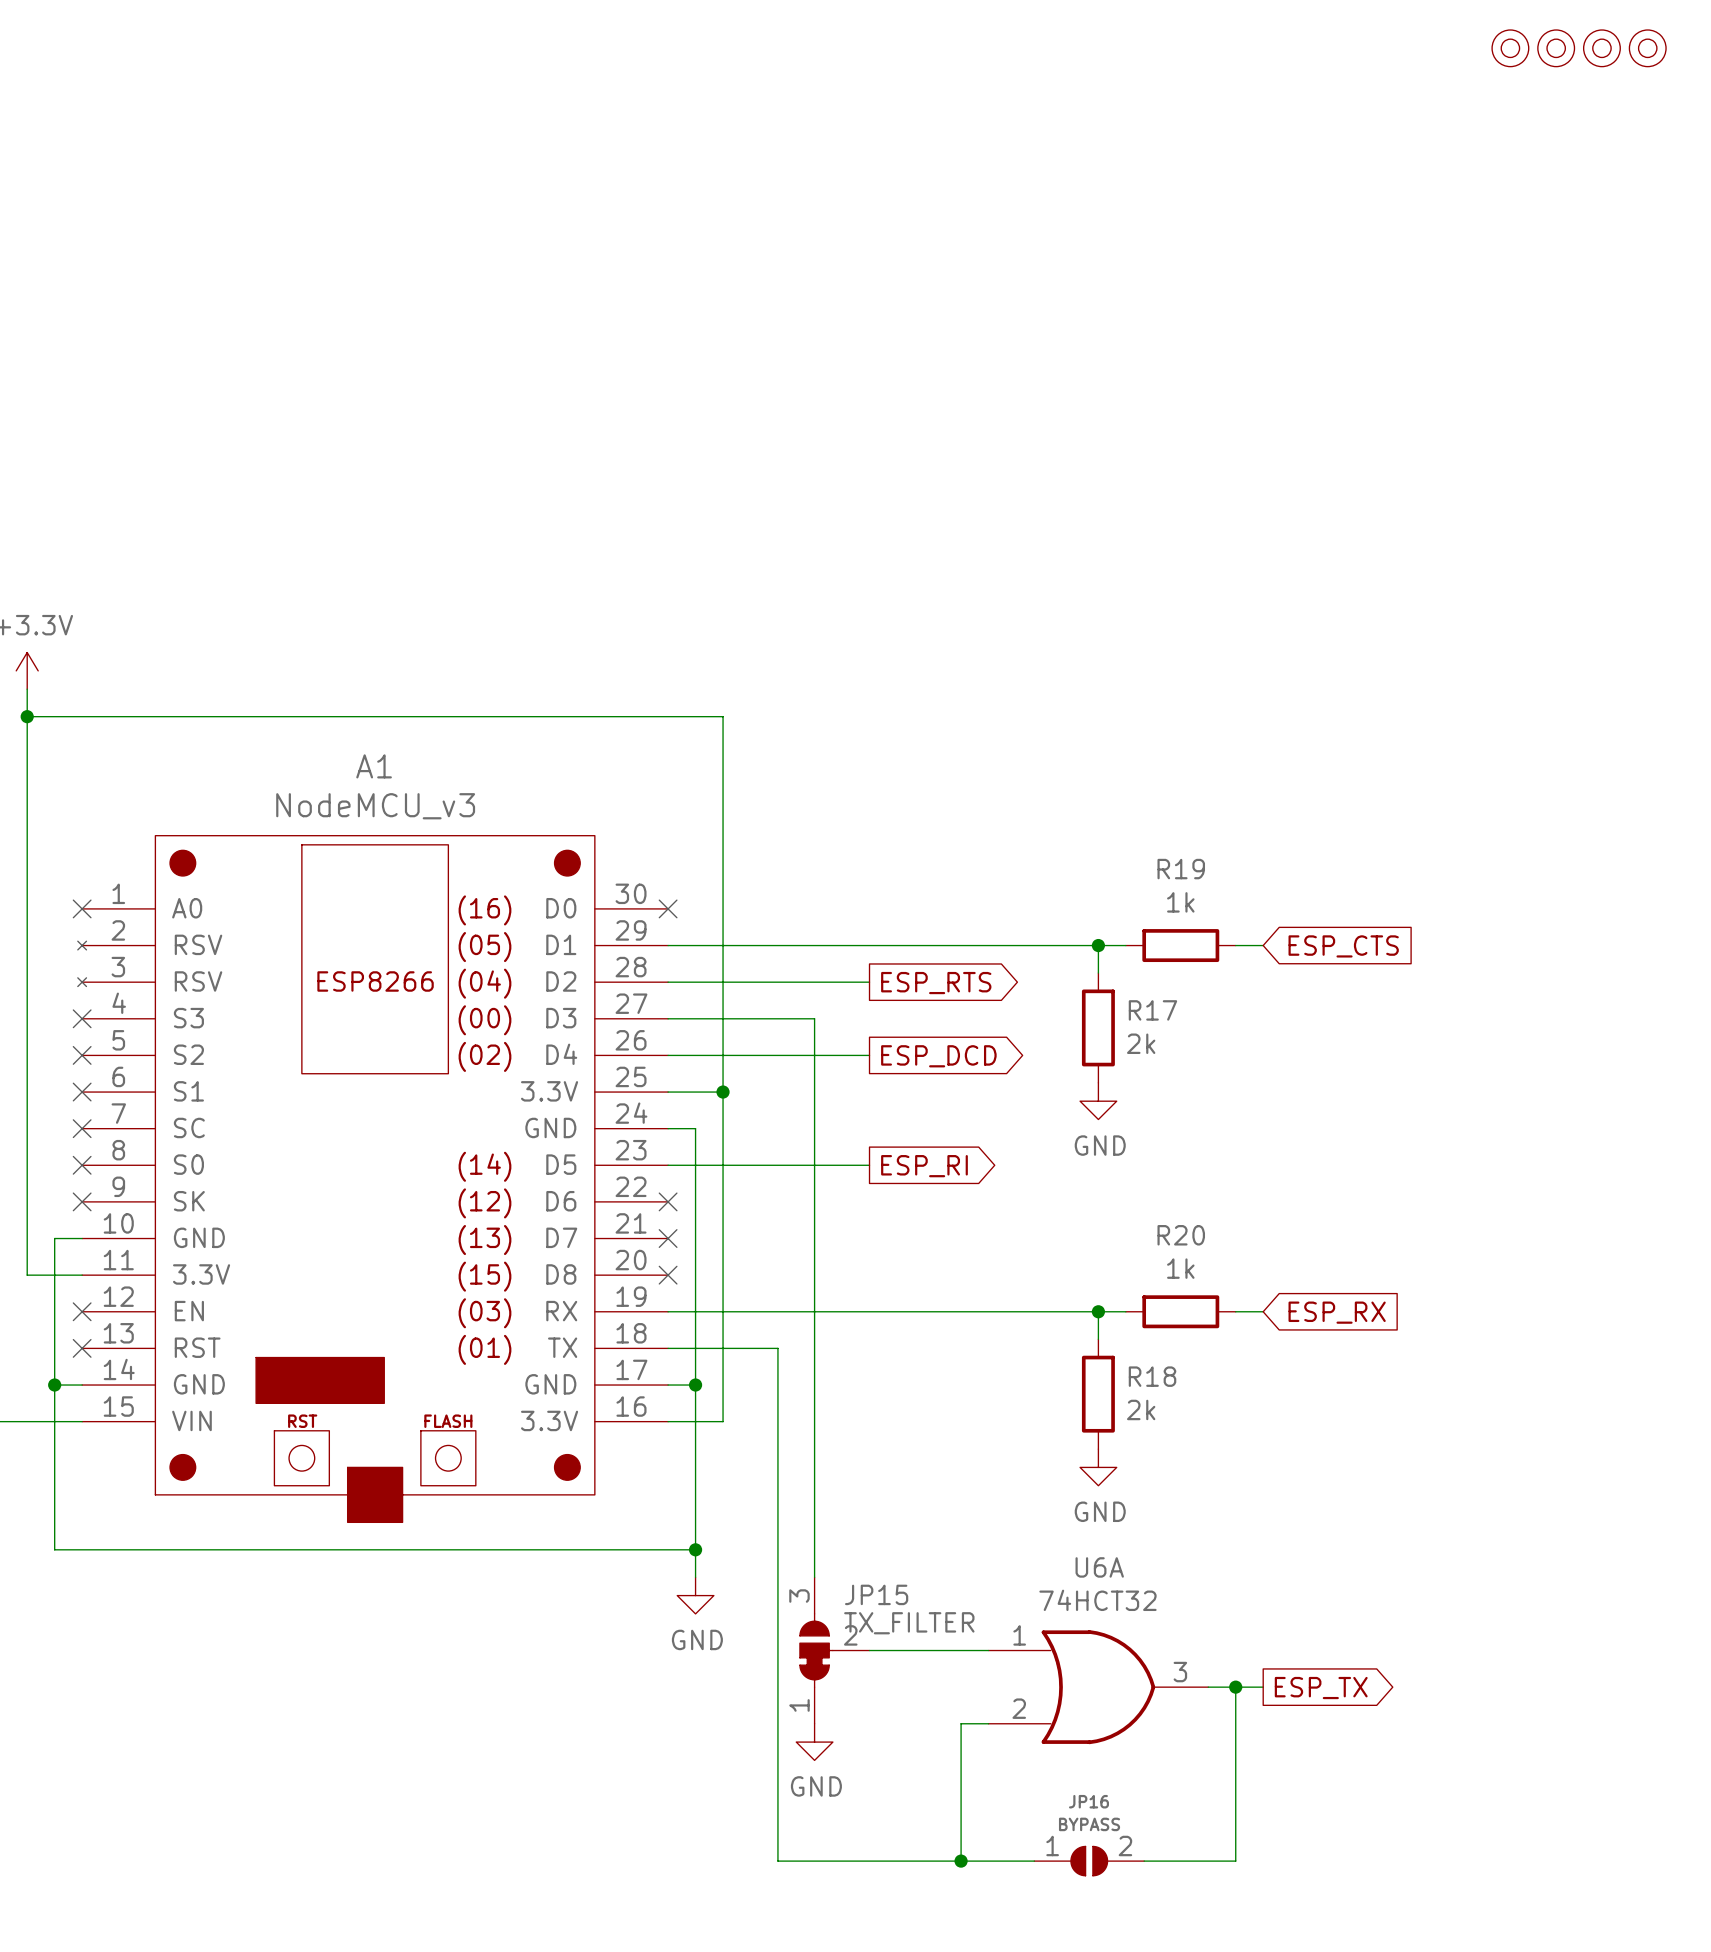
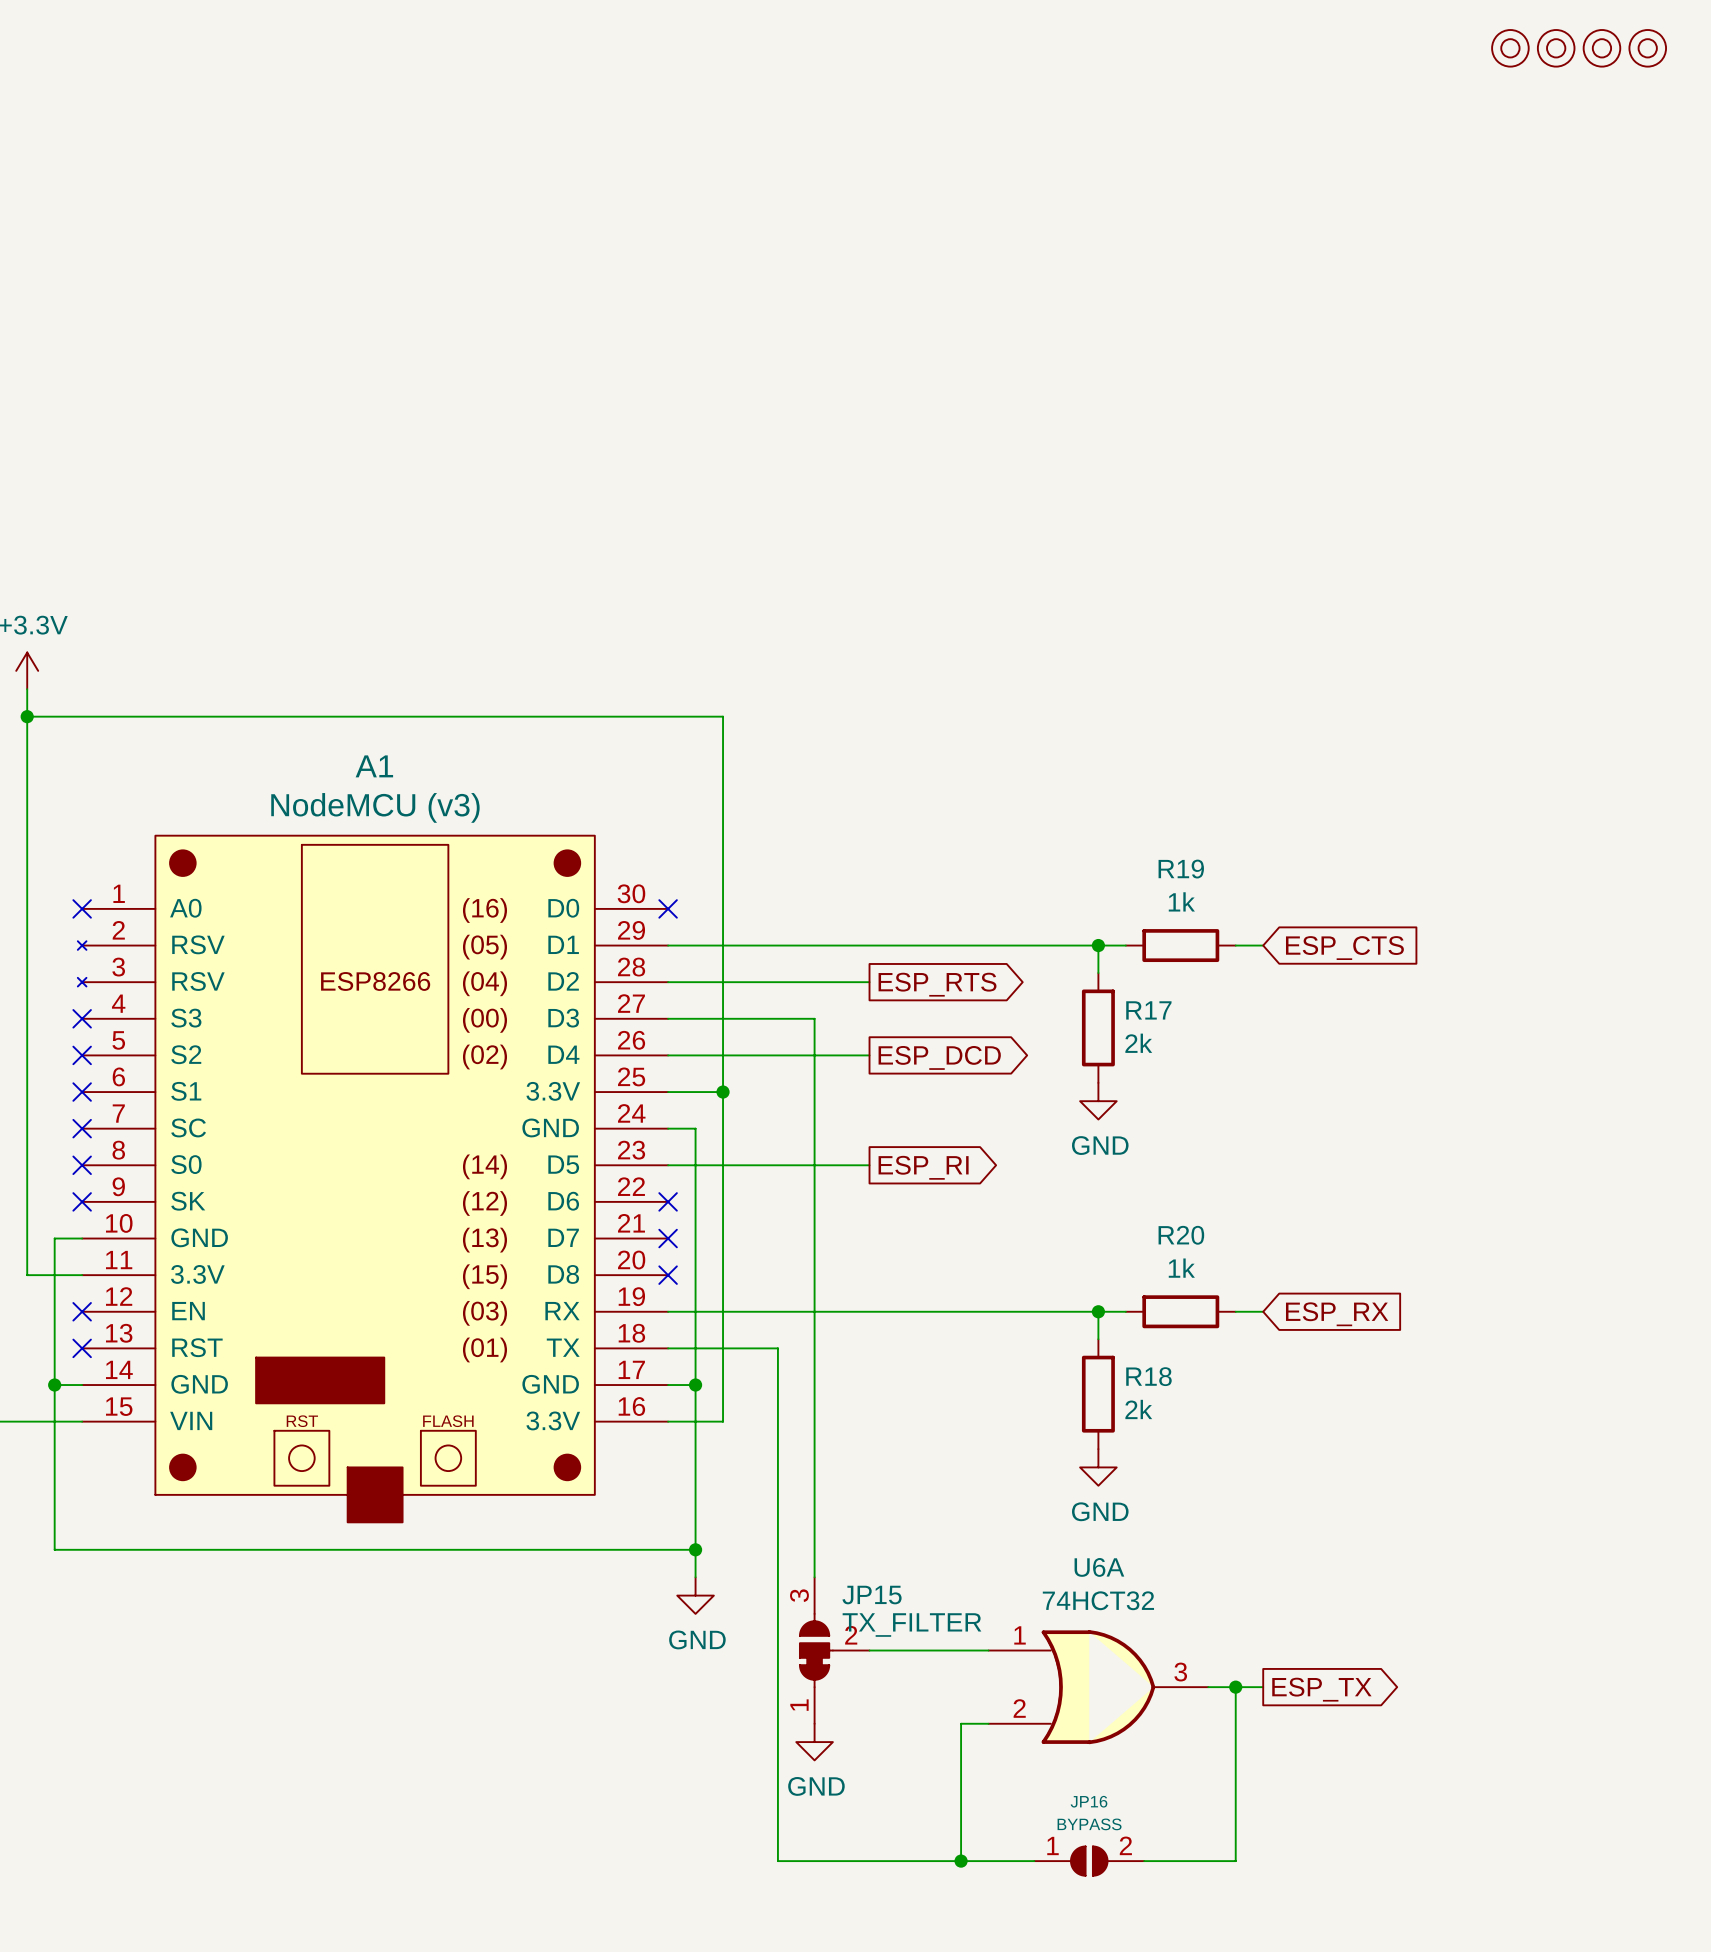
A1 value: NodeMCU_v3 (375, 806) -> NodeMCU (v3) (375, 807)

